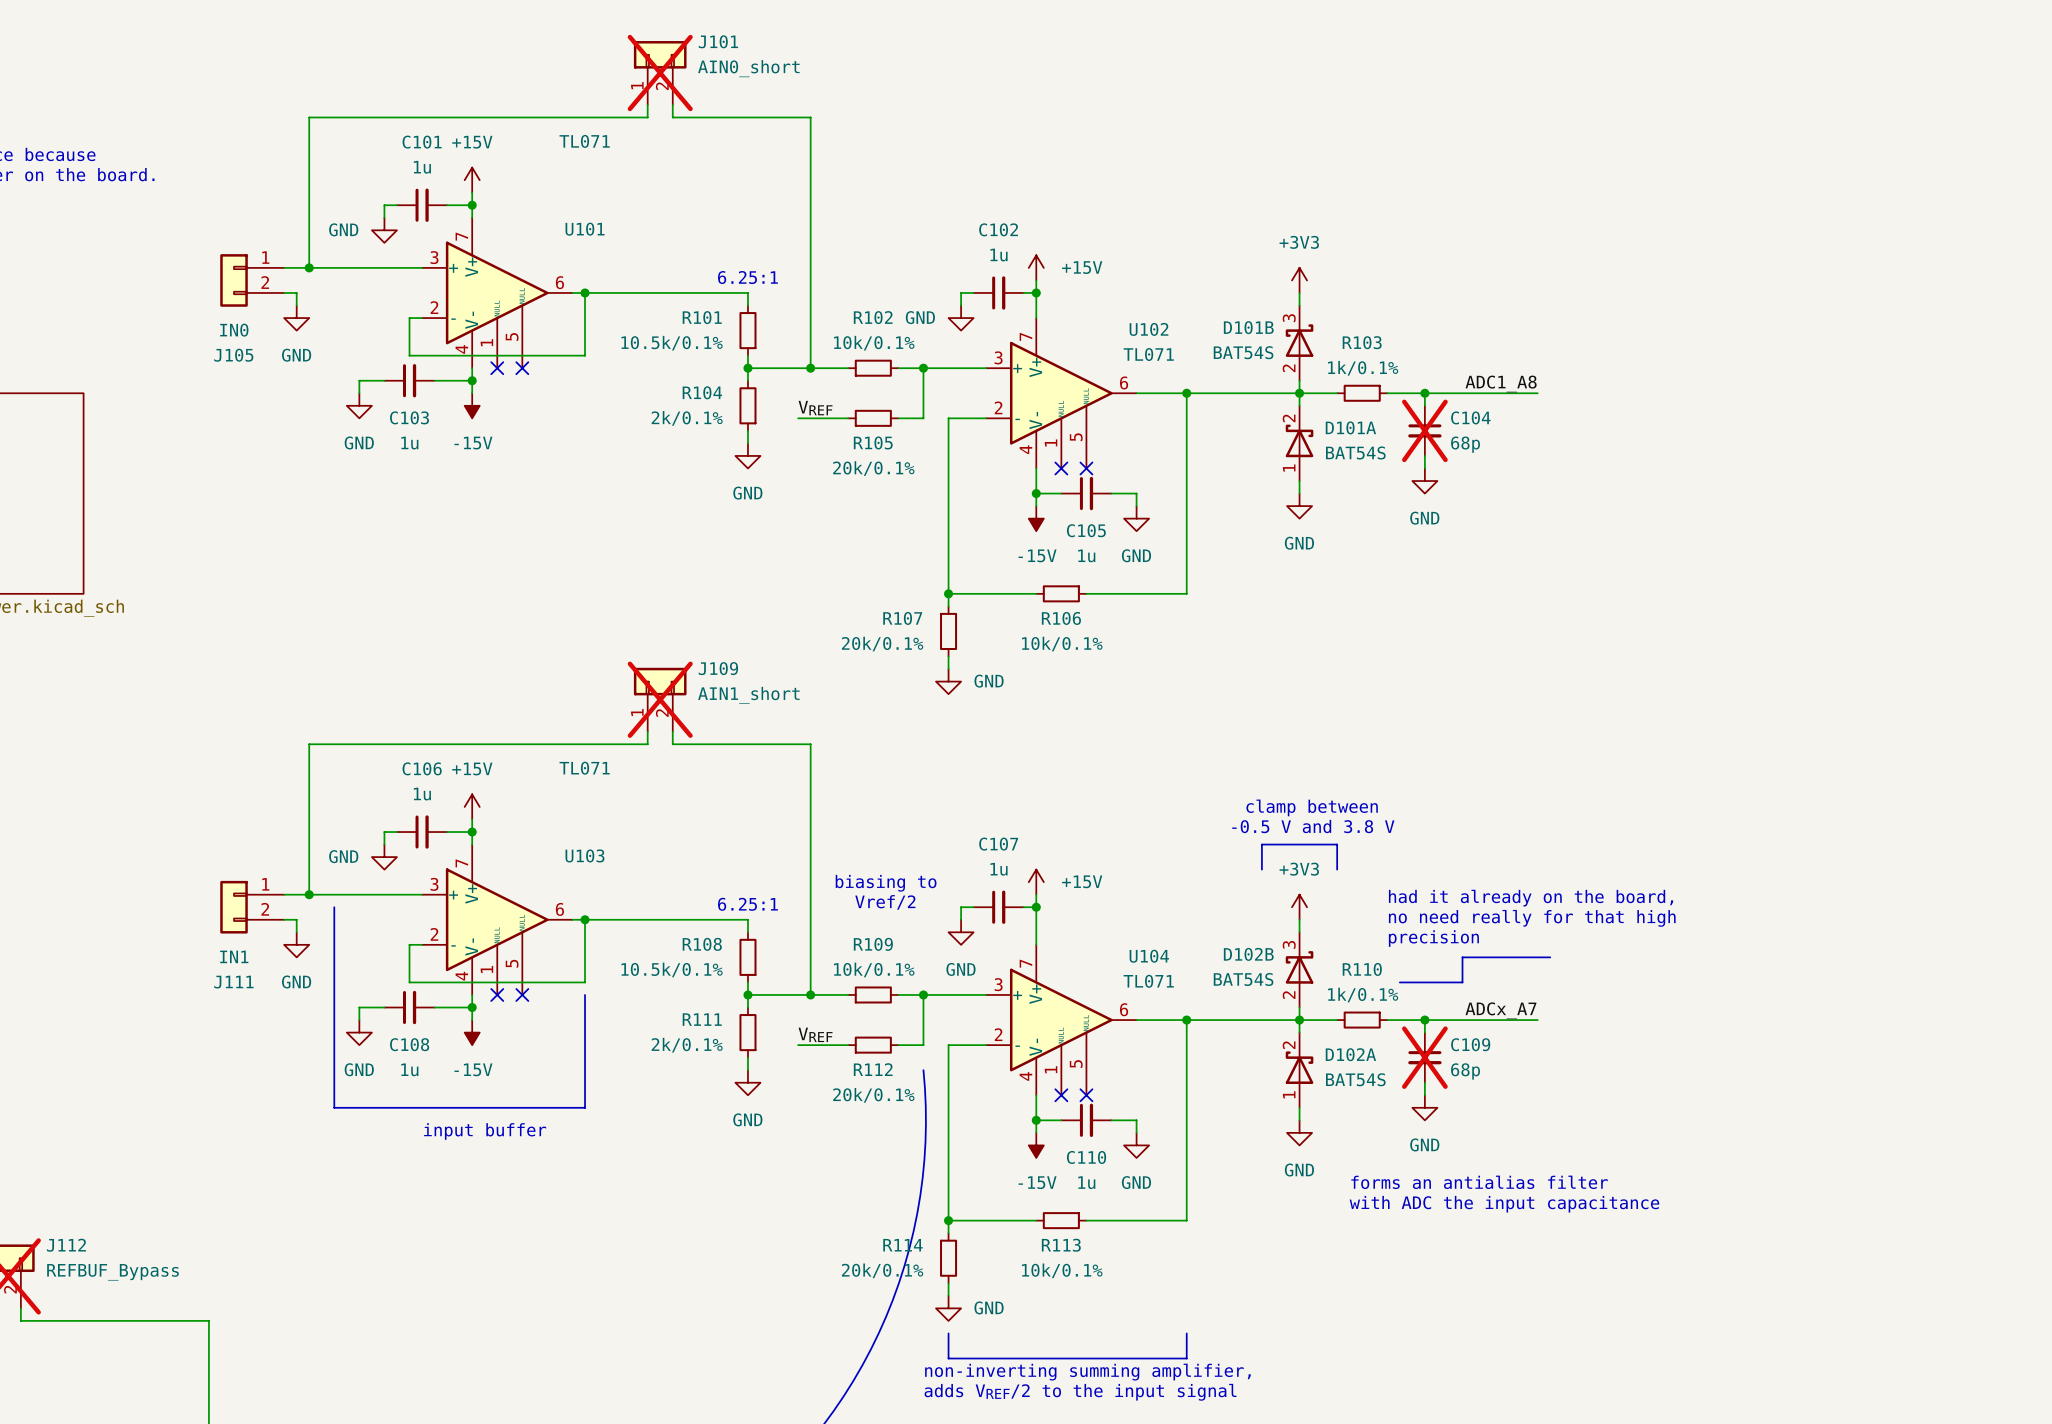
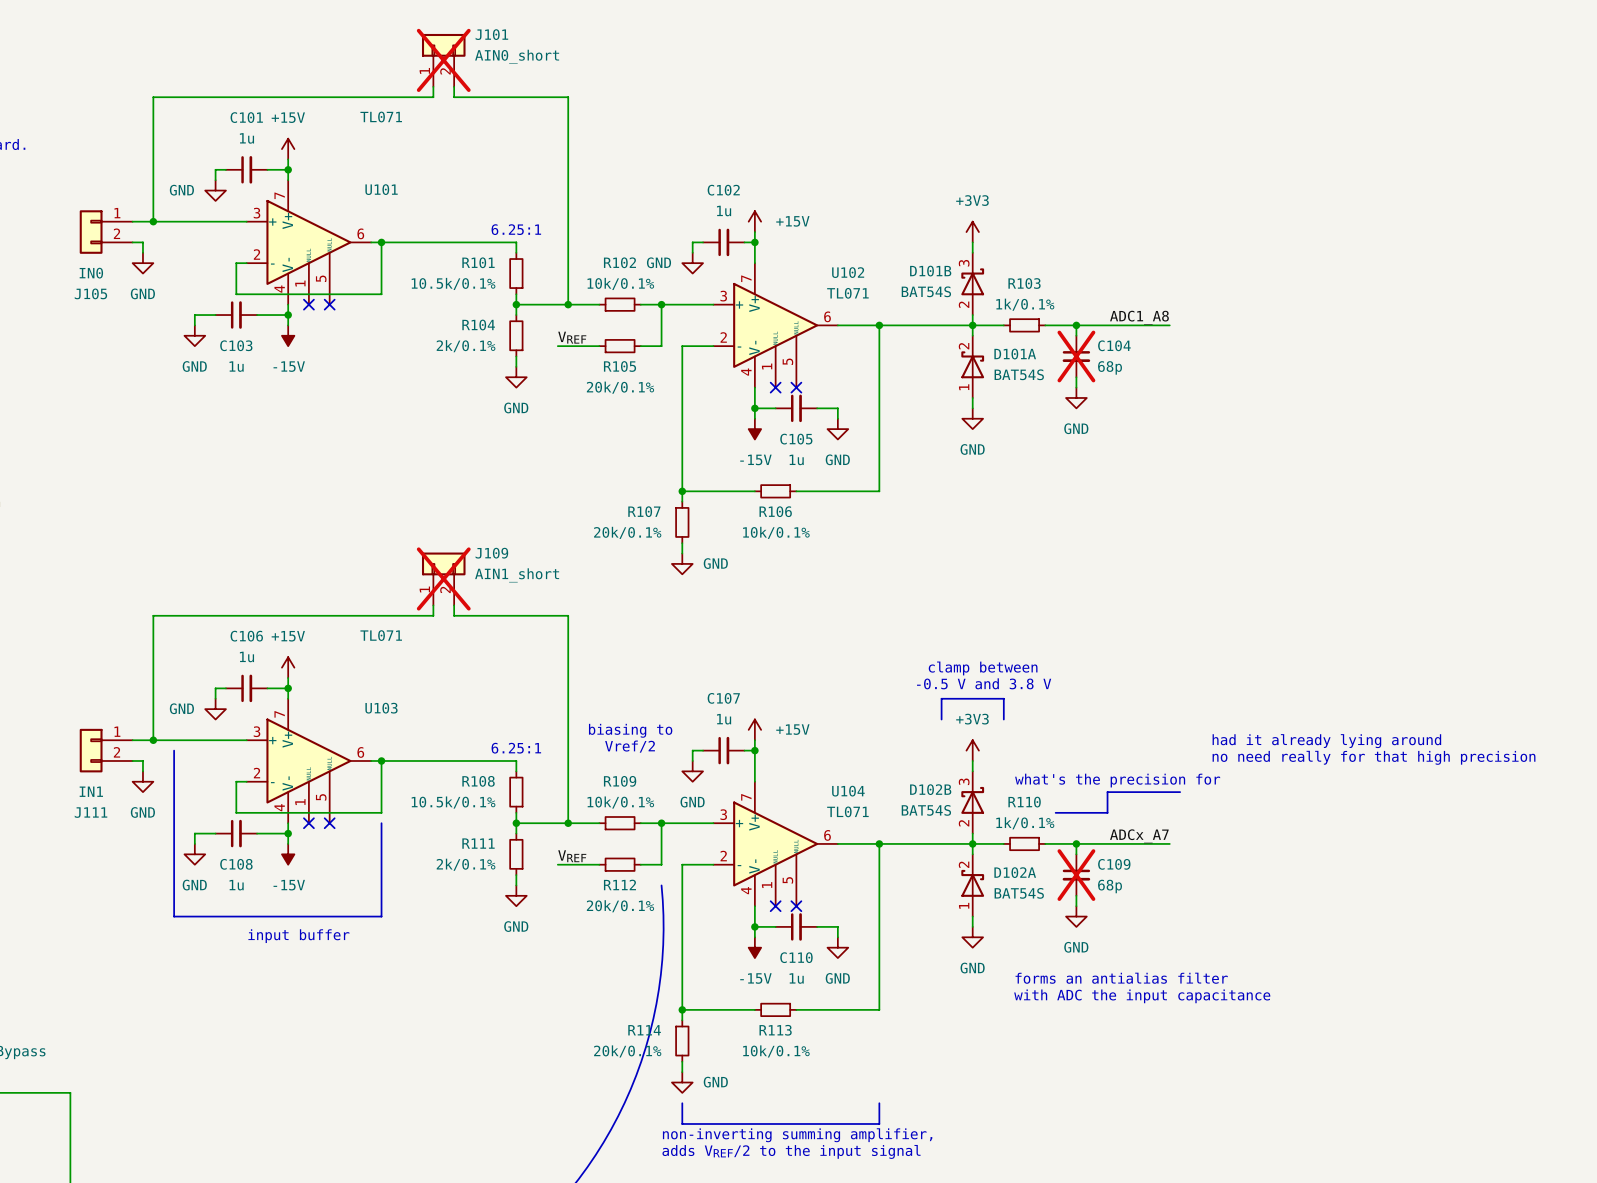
text: had it already on the board, (1531, 898) -> had it already lying around (1326, 741)
text: no need really for that high (1532, 918) -> no need really for that high precision (1374, 757)
text: precision (1433, 938) -> none
text: none -> what's the precision for (1117, 780)

